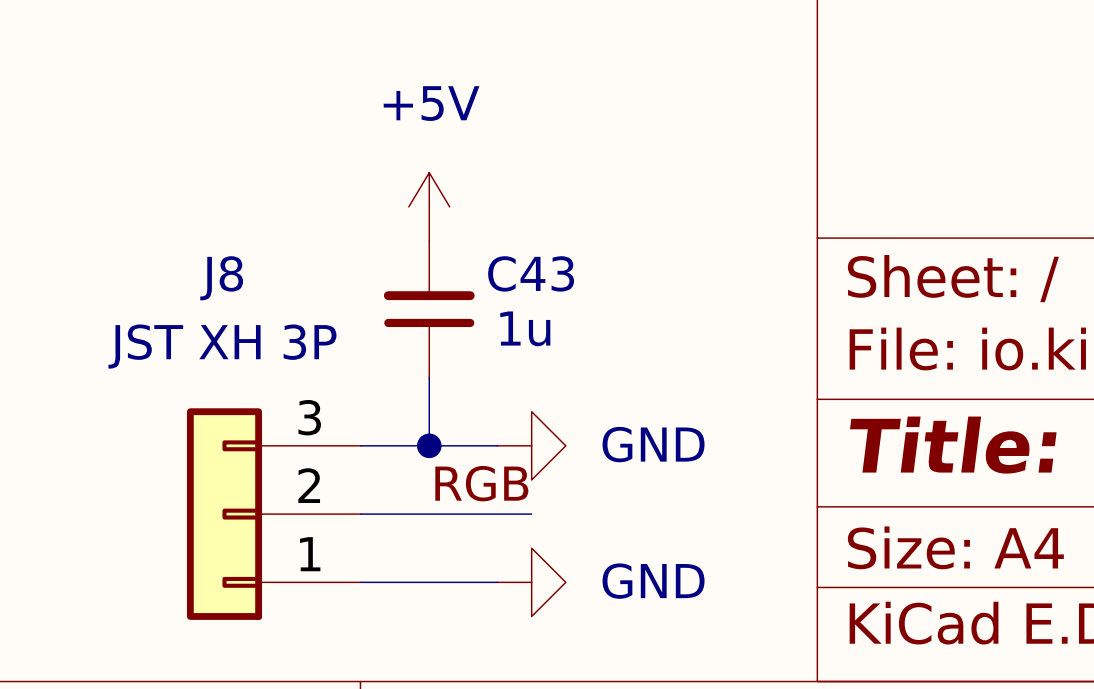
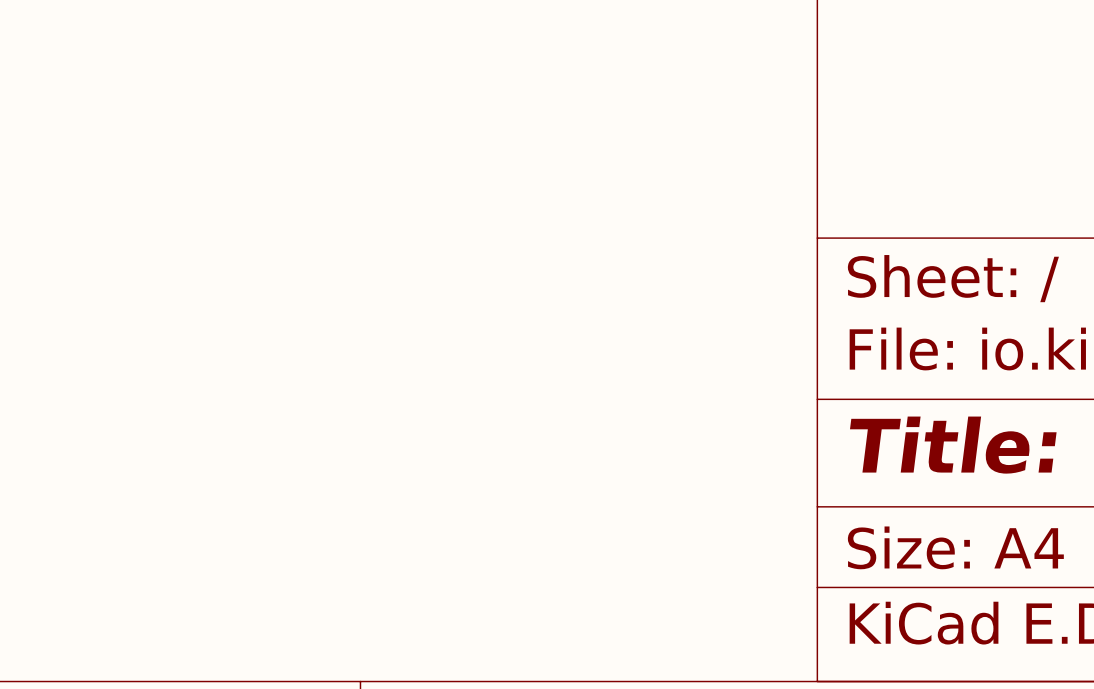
power symbol: +5V (429, 206) -> none
C43: 1u (429, 309) -> none
wire: (429, 377) (429, 445) -> none
wire: (361, 445) (497, 445) -> none
junction: (429, 445) -> none
power symbol: GND (531, 445) -> none
label: RGB (481, 483) -> none
J8: JST XH 3P (273, 514) -> none
wire: (361, 514) (531, 514) -> none
wire: (361, 582) (497, 582) -> none
power symbol: GND (531, 582) -> none

